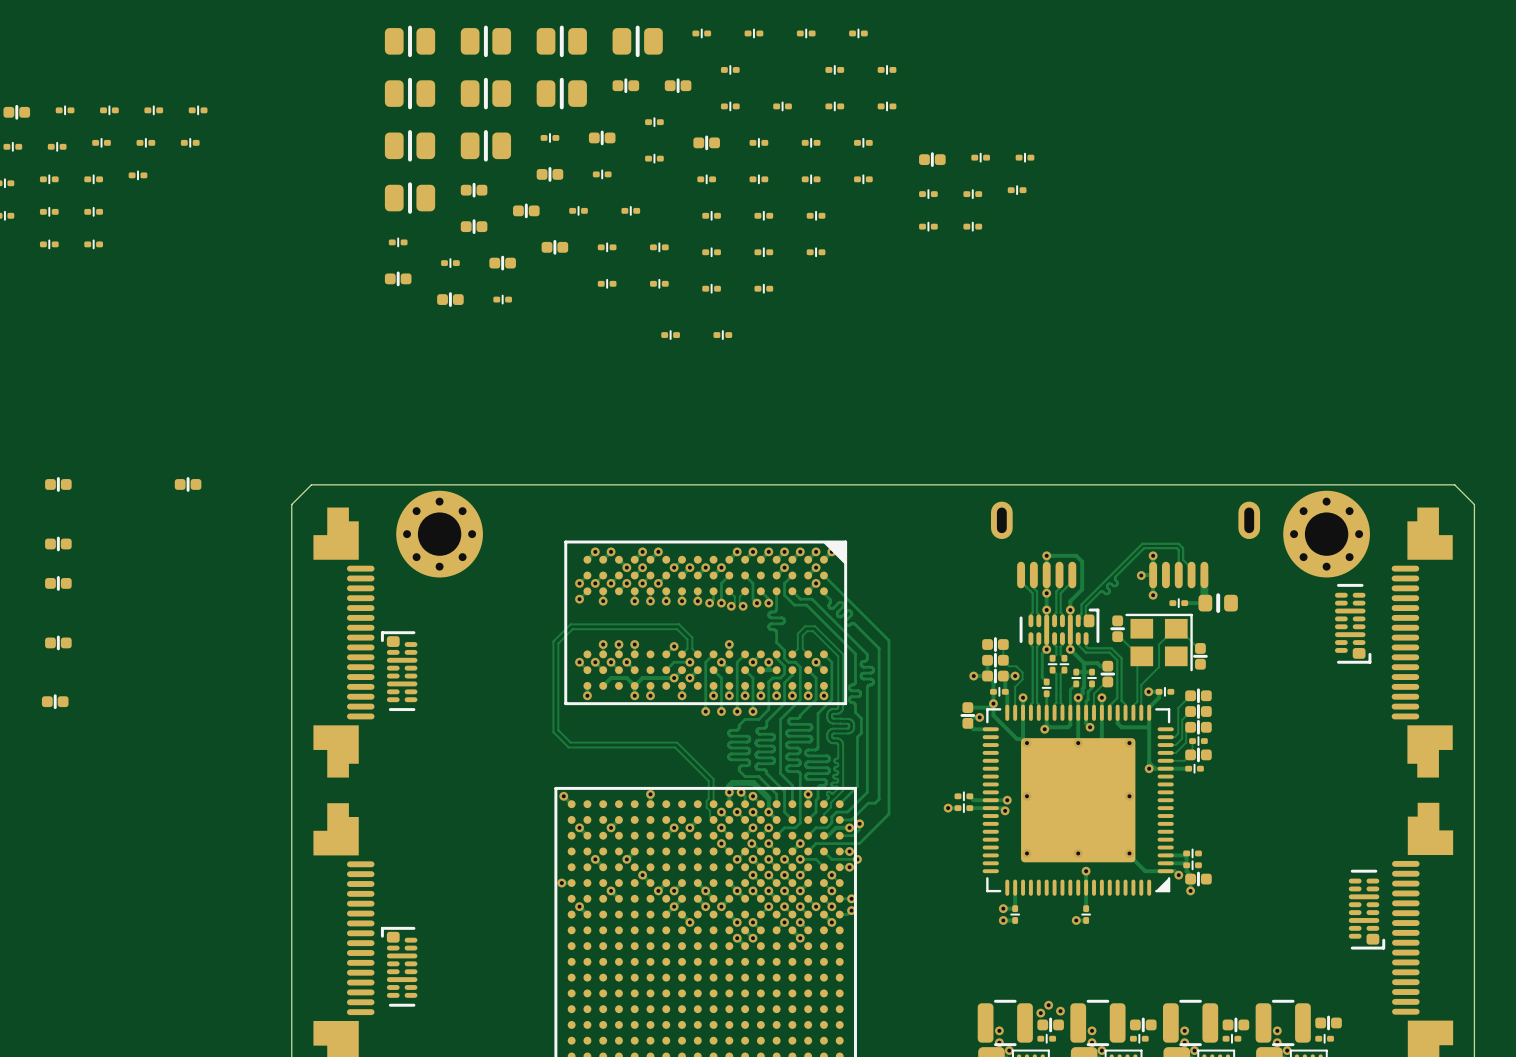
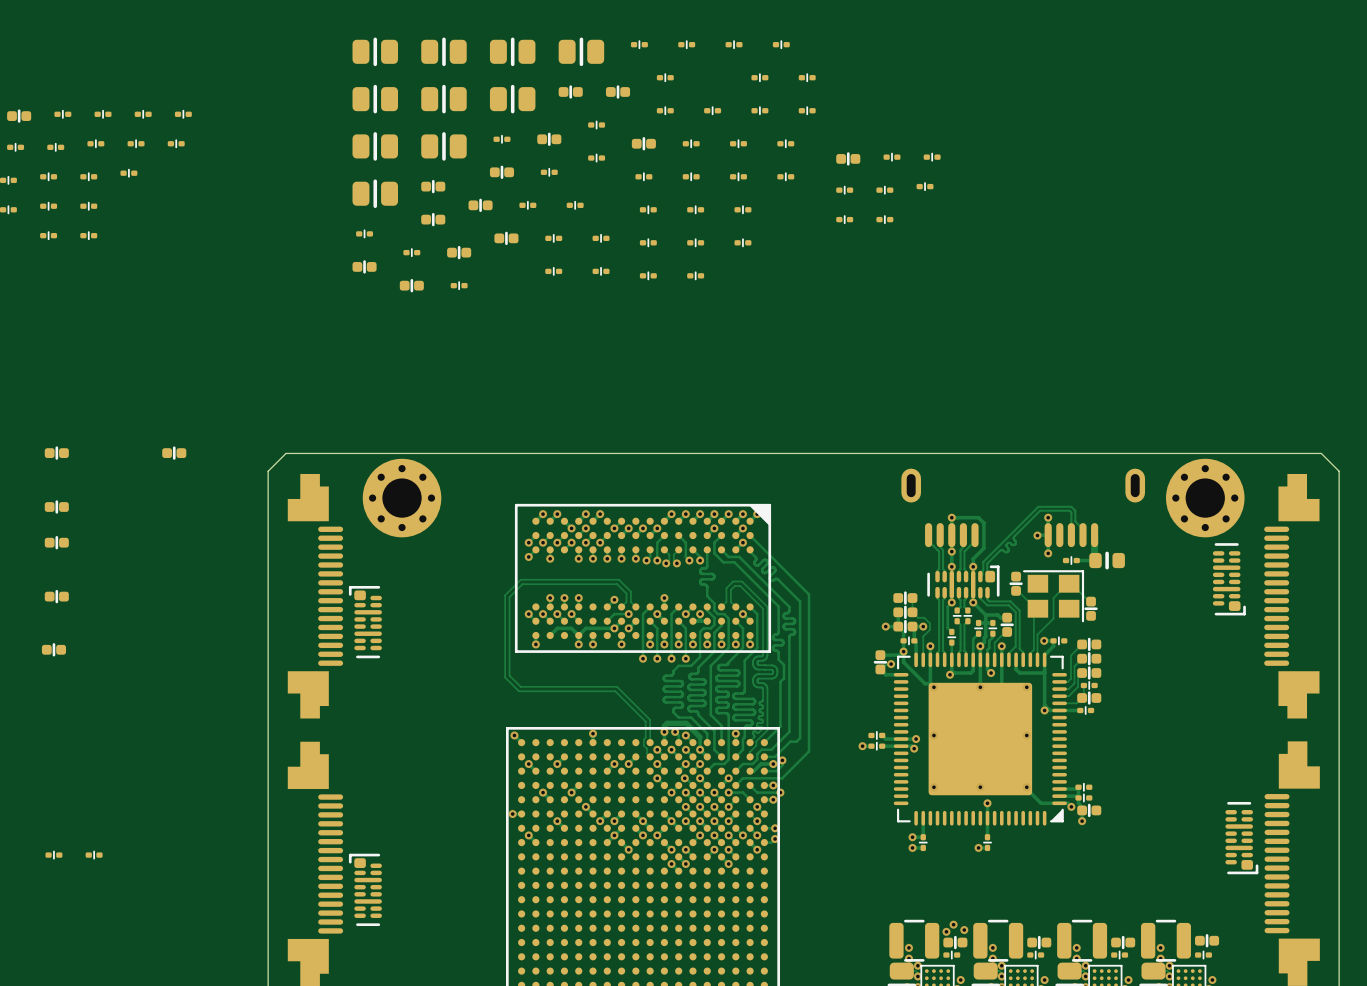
part: (670, 335) -> none
part: (722, 335) -> none
part: none -> (53, 855)
part: none -> (94, 855)

